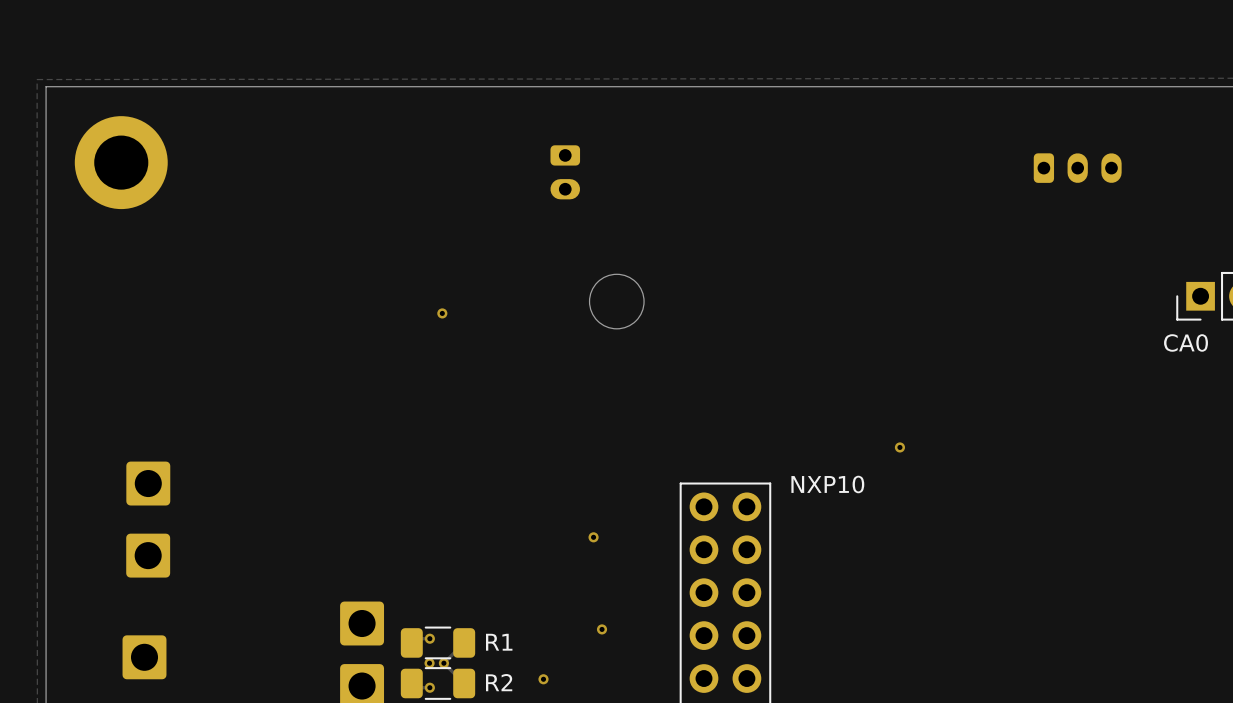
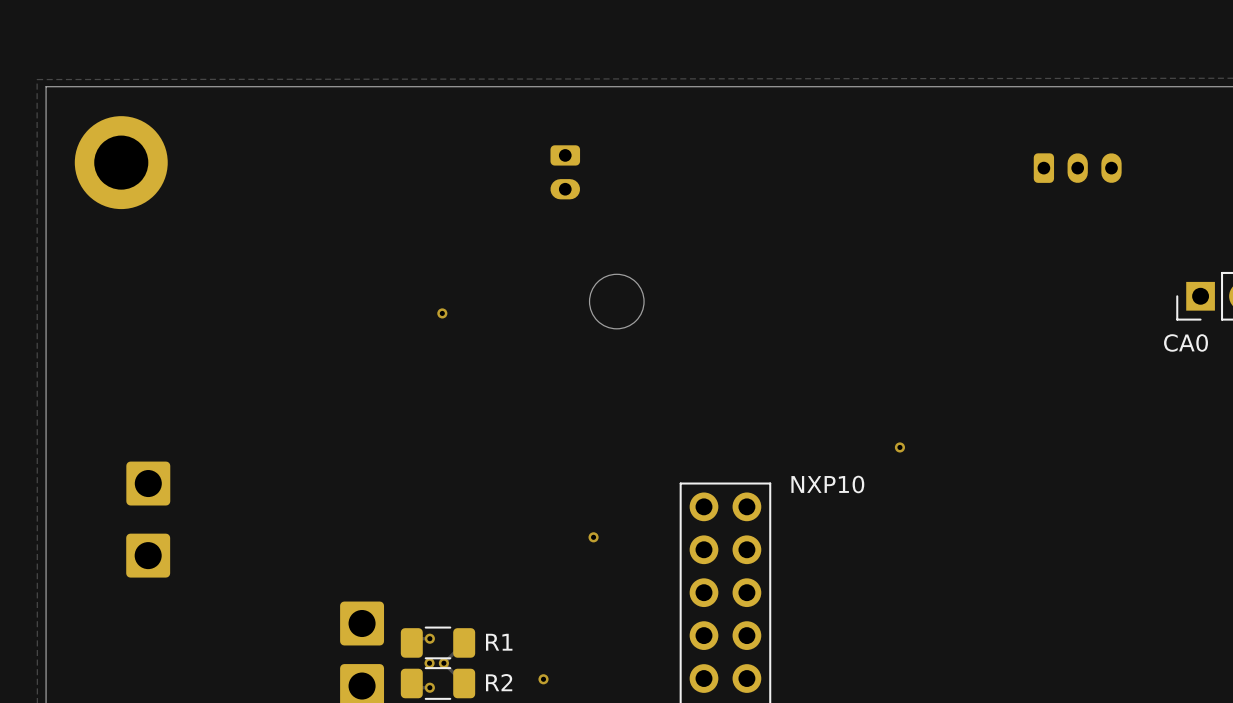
via: (602, 629) -> none
part: (144, 657) -> none

